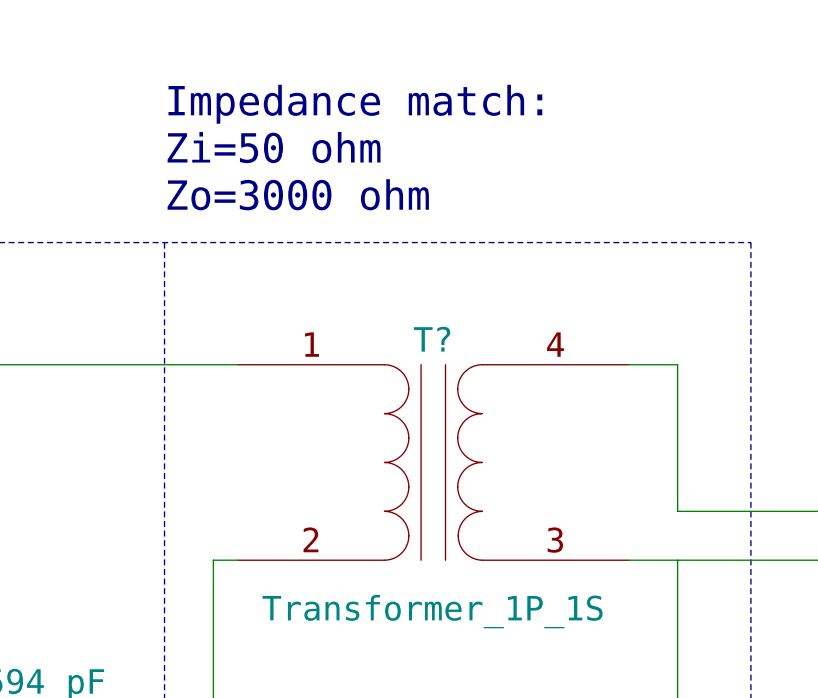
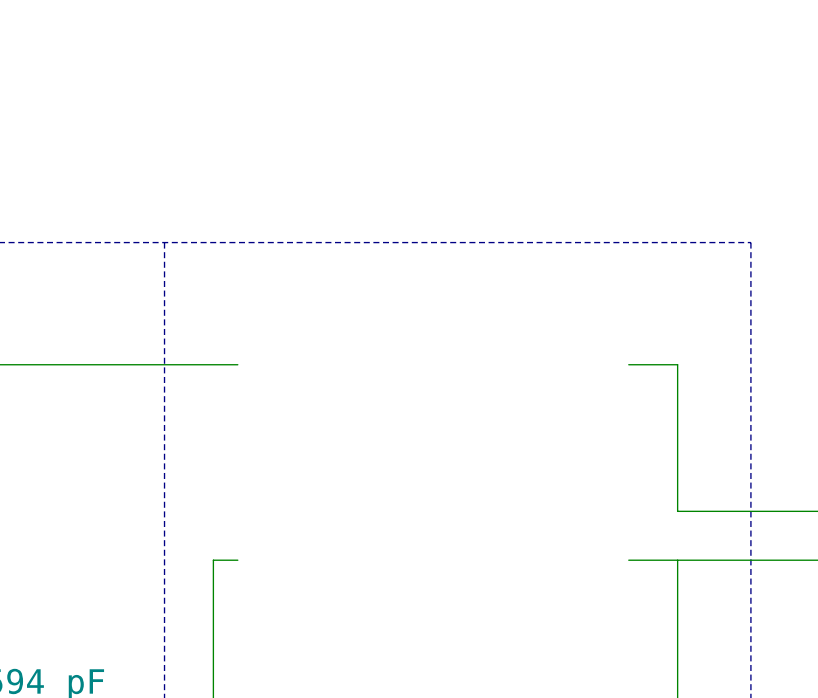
text: Impedance match: (355, 104) -> none
text: Zi=50 ohm (274, 147) -> none
text: Zo=3000 ohm (298, 194) -> none
T?: Transformer_1P_1S (433, 462) -> none

